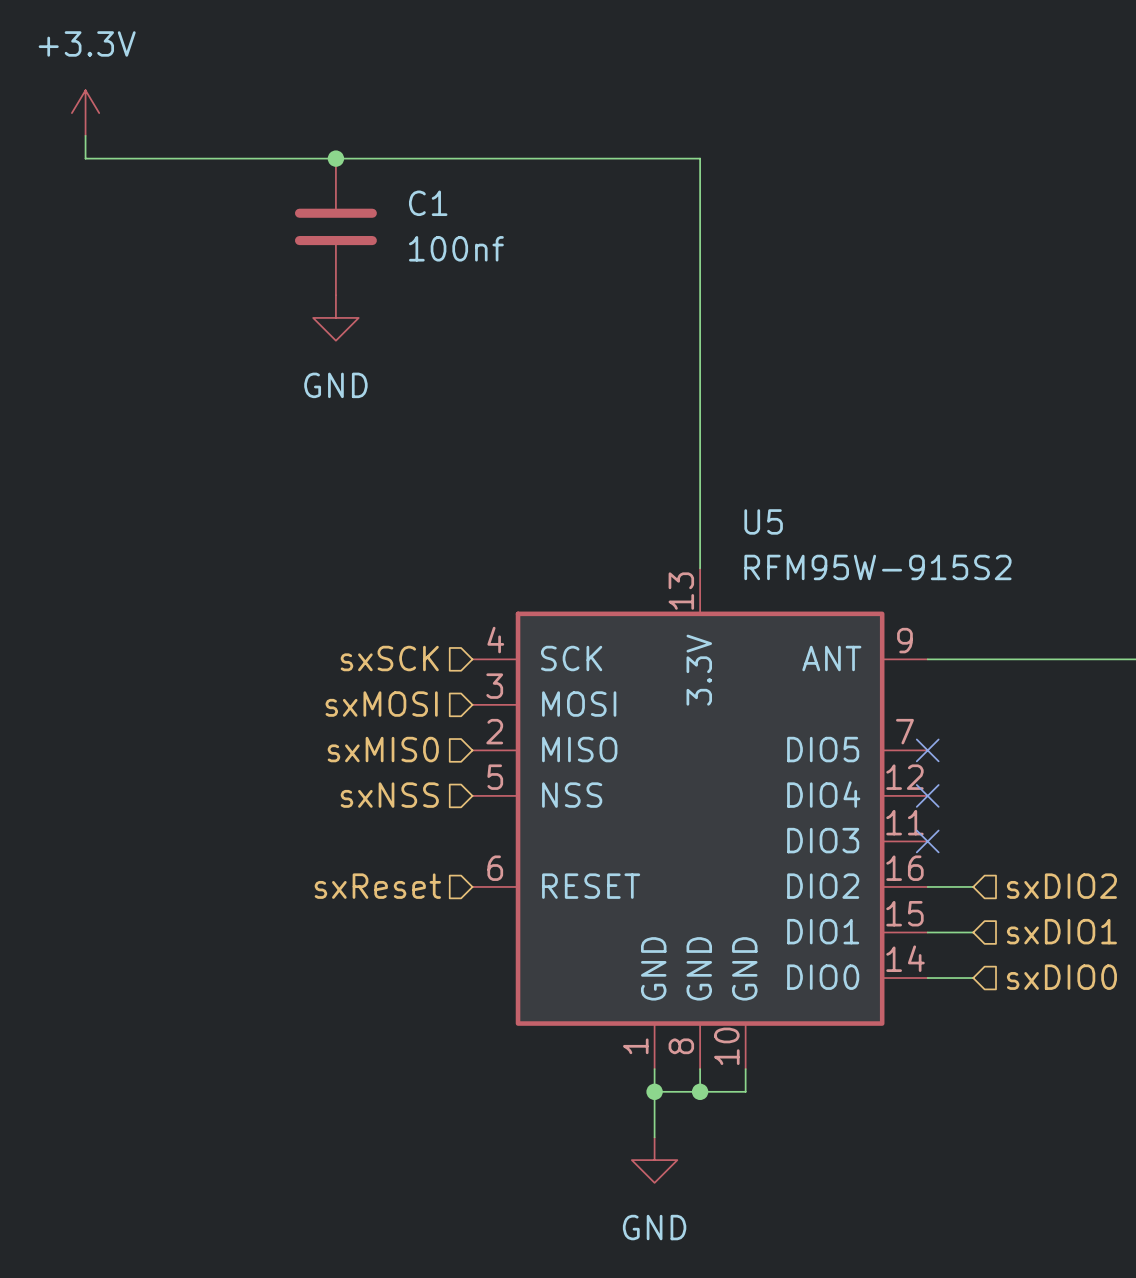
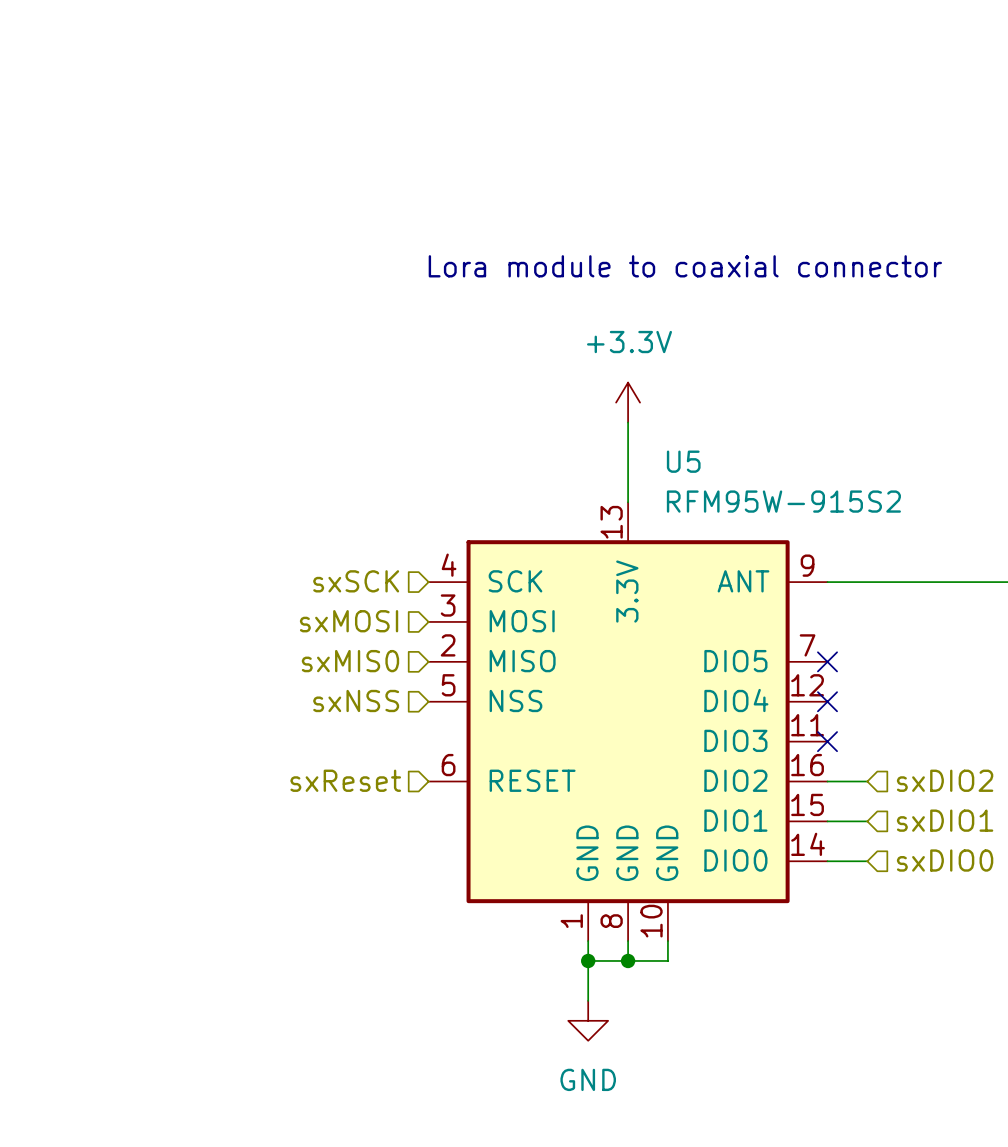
power symbol: +3.3V (85, 113) -> none
wire: (85, 135) (85, 158) (700, 158) (700, 477) -> none
junction: (335, 158) -> none
C1: 100nf (335, 226) -> none
text: none -> Lora module to coaxial connector (685, 266)
power symbol: GND (335, 317) -> none
power symbol: none -> +3.3V (628, 402)

